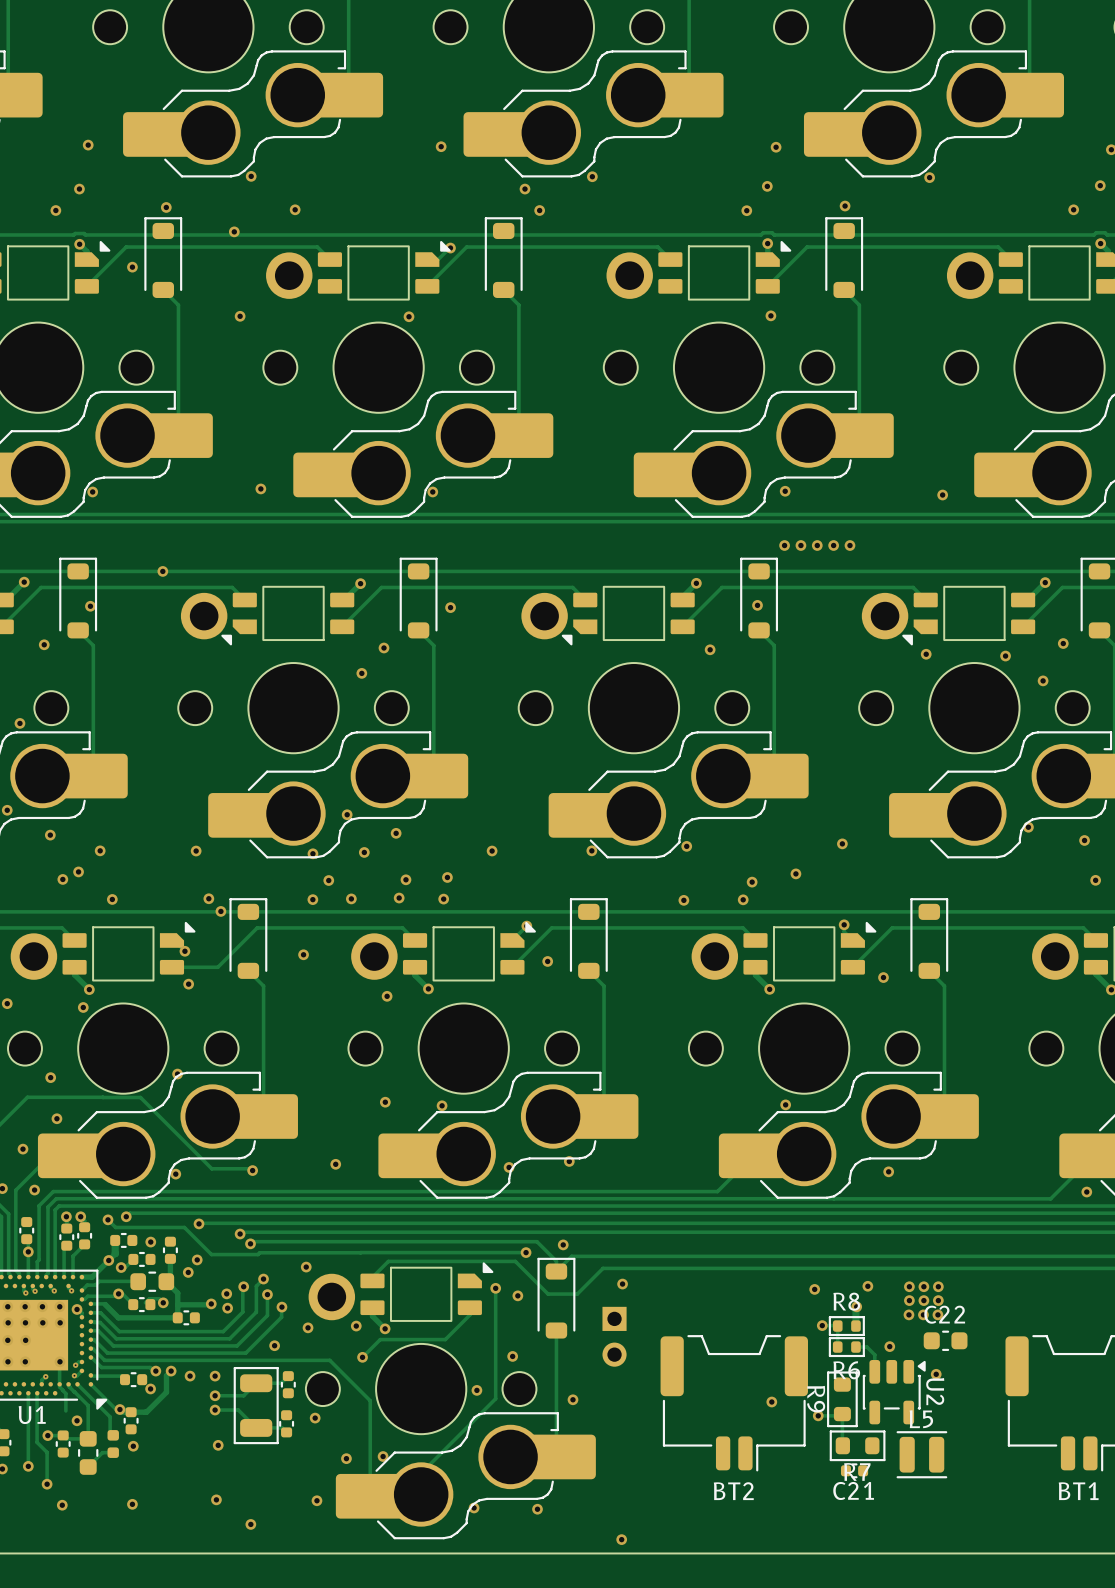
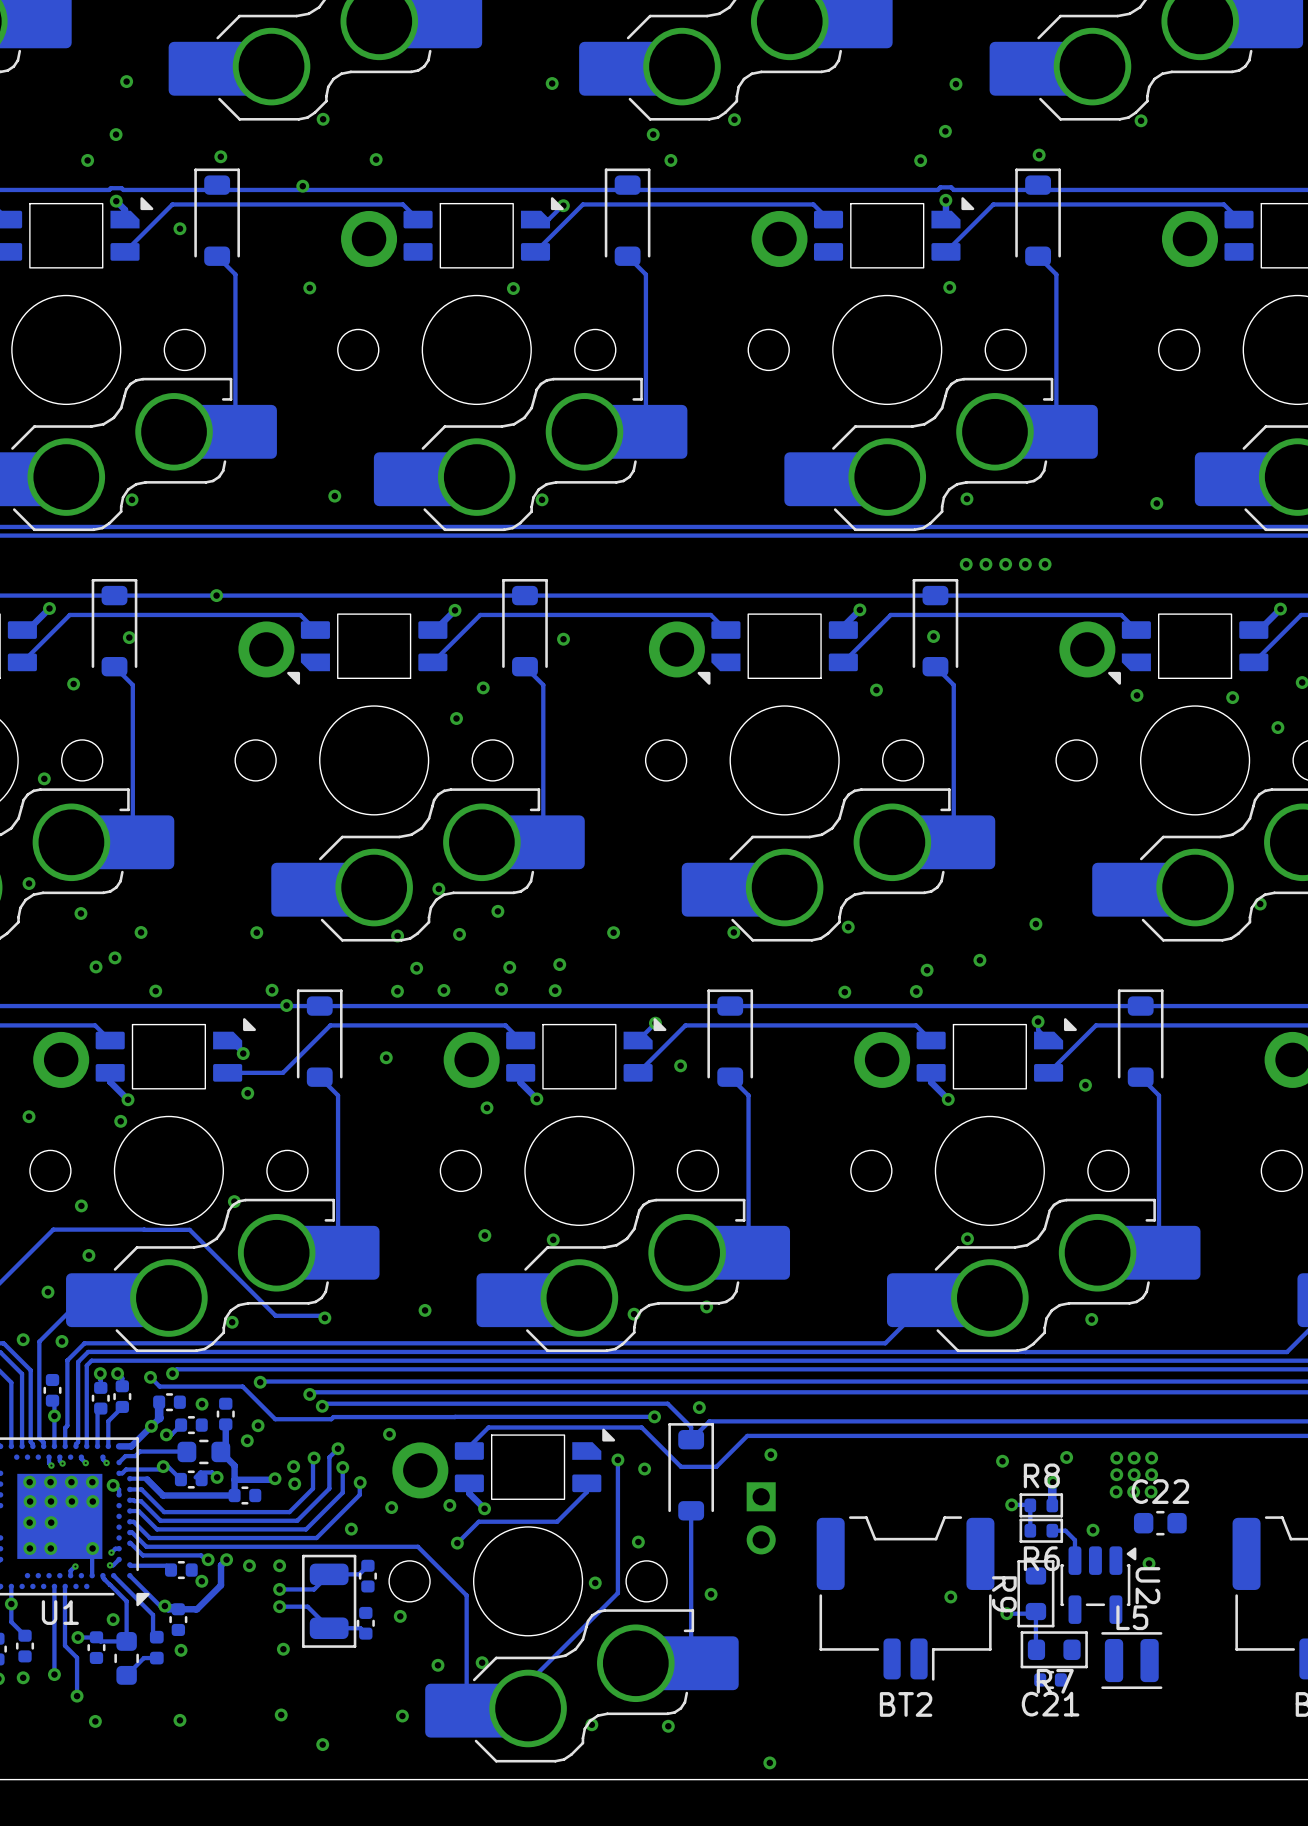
track: (59, 1384) (65, 1393) (65, 1410) -> none

